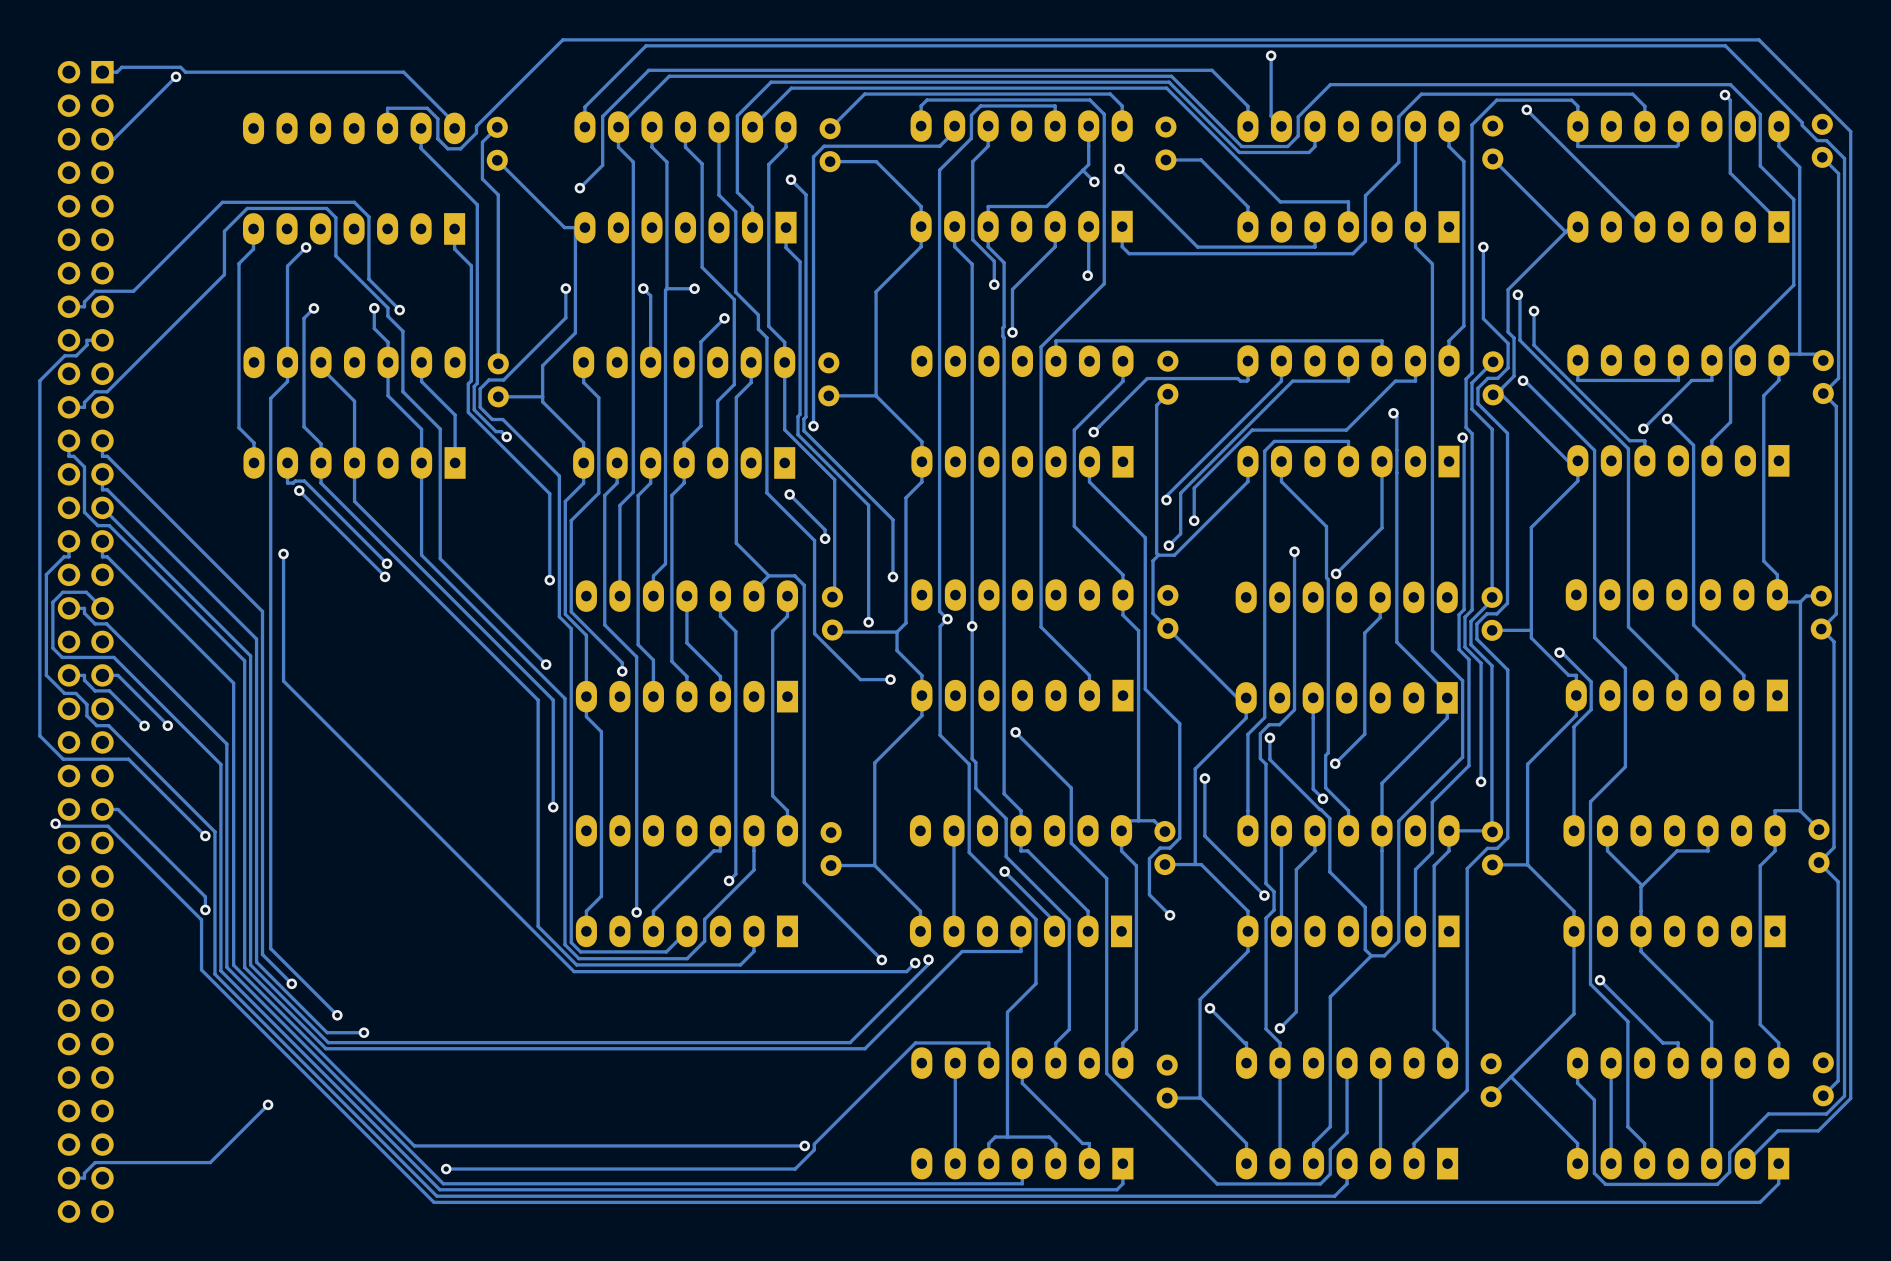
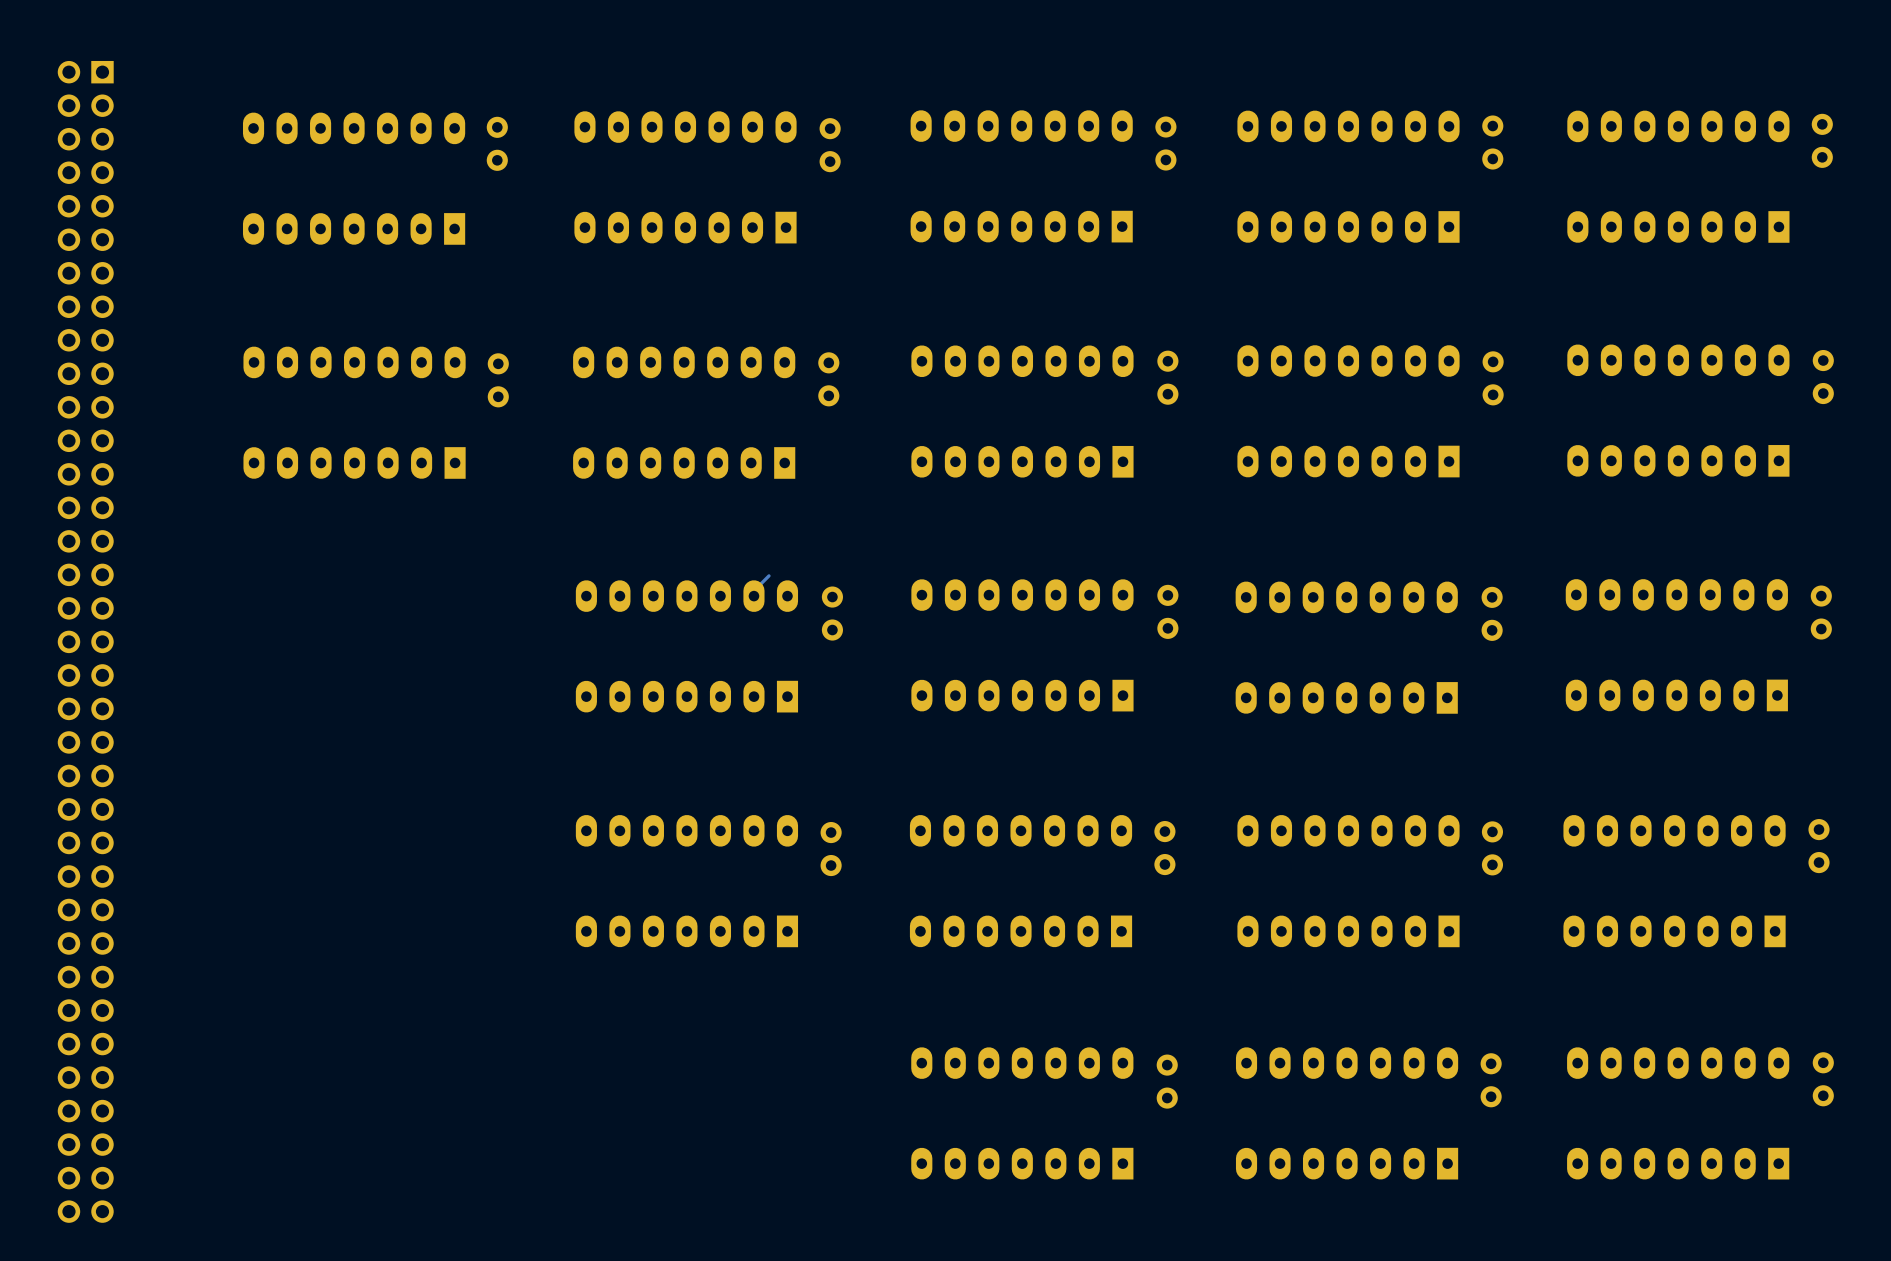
track: (1271, 55) (1271, 116) (1281, 126) -> none
via: (1271, 55) -> none
track: (102, 72) (117, 72) (121, 67) (180, 67) (185, 72) (403, 72) (454, 123) (454, 128) -> none
track: (176, 76) (113, 139) (102, 139) -> none
via: (176, 76) -> none
track: (1725, 95) (1730, 100) (1730, 173) (1778, 221) (1778, 226) -> none
via: (1725, 95) -> none
track: (1526, 109) (1644, 226) -> none
via: (1526, 109) -> none
track: (921, 126) (921, 105) (927, 100) (1089, 100) (1104, 114) (1104, 283) (1041, 346) (1041, 627) (1089, 675) (1089, 695) -> none
track: (954, 126) (954, 131) (939, 146) (824, 146) (813, 156) (813, 426) -> none
track: (988, 126) (988, 146) (972, 161) (972, 239) (994, 261) (994, 284) -> none
track: (1055, 126) (1055, 105) (980, 105) (971, 115) (971, 138) (939, 170) (939, 611) (947, 619) (940, 626) (940, 735) (969, 764) (969, 852) (1035, 919) (1035, 983) (1007, 1012) (1007, 1137) -> none
track: (1088, 126) (1088, 164) (1046, 206) (988, 206) (988, 246) (1004, 262) (1004, 793) (1021, 810) (1021, 850) (1027, 850) (1088, 911) (1088, 931) -> none
track: (1122, 126) (1122, 105) (1110, 94) (864, 94) (830, 128) -> none
track: (1247, 126) (1247, 106) (1211, 70) (648, 70) (602, 116) (602, 165) (579, 188) -> none
track: (1314, 126) (1314, 146) (1309, 152) (1239, 152) (1169, 82) (771, 82) (737, 115) (737, 192) (752, 207) (752, 227) -> none
track: (1415, 126) (1415, 247) (1432, 263) (1432, 650) (1462, 680) (1462, 757) (1398, 821) (1398, 941) (1384, 955) (1371, 955) -> none
track: (1449, 126) (1449, 146) (1463, 161) (1463, 326) (1449, 340) (1449, 361) -> none
track: (1644, 126) (1644, 106) (1632, 94) (1421, 94) (1398, 116) (1398, 162) (1365, 195) (1365, 241) (1352, 253) (1129, 253) (1122, 246) (1122, 226) -> none
track: (1678, 126) (1676, 146) (1577, 146) (1577, 106) (1571, 100) (1496, 100) (1472, 124) (1472, 373) (1466, 379) (1466, 427) (1472, 433) (1472, 610) (1465, 617) (1465, 647) (1481, 663) (1481, 781) -> none
track: (1778, 126) (1778, 146) (1799, 167) (1799, 354) -> none
track: (497, 127) (482, 142) (482, 179) (498, 194) (498, 363) -> none
track: (584, 127) (584, 106) (646, 45) (1725, 45) (1802, 122) (1802, 125) (1817, 140) (1826, 140) (1844, 158) (1844, 1095) (1826, 1113) (1768, 1113) (1729, 1152) (1729, 1172) (1717, 1184) (1605, 1184) (1594, 1173) (1594, 1099) (1577, 1083) (1577, 1063) -> none
track: (651, 127) (651, 147) (666, 162) (666, 288) -> none
track: (685, 127) (685, 147) (702, 163) (702, 267) (734, 299) (734, 384) (717, 401) (717, 462) -> none
track: (719, 127) (719, 195) (735, 211) (735, 292) (758, 314) (758, 329) (766, 337) (766, 492) (814, 540) (814, 633) (860, 679) (890, 679) -> none
track: (752, 127) (791, 88) (1166, 88) (1280, 201) (1348, 201) (1348, 226) -> none
track: (786, 127) (786, 147) (768, 164) (768, 326) (784, 342) (784, 429) (834, 479) (834, 594) (832, 597) -> none
track: (387, 128) (387, 108) (427, 108) (437, 118) (437, 138) (447, 148) (460, 148) (476, 132) (476, 126) (562, 39) (1759, 39) (1850, 131) (1850, 1098) (1818, 1130) (1777, 1130) (1745, 1163) -> none
track: (421, 128) (421, 148) (477, 204) (477, 383) (474, 386) (474, 409) (496, 431) (501, 431) (506, 436) -> none
track: (1822, 157) (1838, 173) (1838, 378) (1823, 393) (1836, 406) (1836, 614) (1821, 629) (1834, 641) (1834, 847) (1819, 862) (1838, 881) (1838, 1080) (1823, 1095) -> none
track: (1165, 159) (1201, 159) (1247, 206) (1247, 226) -> none
track: (1492, 159) (1565, 232) -> none
track: (497, 160) (564, 227) (584, 227) -> none
track: (830, 161) (876, 161) (921, 206) (921, 246) (876, 291) (876, 395) -> none
track: (1119, 168) (1197, 247) (1314, 247) (1314, 226) -> none
via: (1119, 168) -> none
track: (1082, 170) (1094, 181) -> none
track: (791, 179) (805, 194) (805, 416) (803, 419) (803, 430) (892, 519) (892, 577) -> none
via: (791, 179) -> none
via: (1094, 181) -> none
via: (579, 188) -> none
track: (954, 226) (954, 246) (972, 264) (972, 758) (975, 762) (975, 788) (1006, 818) (1006, 856) (1069, 919) (1069, 1029) (1055, 1042) (1055, 1063) -> none
track: (1055, 226) (1055, 246) (1012, 289) (1012, 332) -> none
track: (1088, 226) (1087, 275) -> none
track: (1577, 226) (1570, 226) (1508, 289) (1508, 332) (1514, 338) (1514, 376) (1501, 388) (1501, 394) -> none
track: (575, 227) (575, 332) (542, 365) (542, 401) (583, 442) (583, 483) (565, 501) (565, 614) (586, 635) (586, 716) (601, 731) (601, 896) (586, 911) (586, 931) -> none
track: (786, 227) (786, 247) (800, 261) (800, 414) (798, 416) (798, 434) (868, 505) (868, 622) -> none
track: (253, 228) (253, 249) (239, 263) (239, 427) (254, 442) (254, 462) -> none
track: (454, 228) (454, 249) (471, 265) (471, 380) (468, 383) (468, 412) (549, 493) (549, 580) -> none
track: (306, 247) (287, 266) (287, 381) (270, 398) (270, 948) (337, 1015) -> none
via: (306, 247) -> none
track: (1483, 247) (1483, 318) (1508, 343) (1508, 367) (1497, 378) (1487, 378) (1477, 388) (1477, 403) (1507, 433) (1507, 603) (1496, 613) (1486, 613) (1476, 623) (1476, 639) (1507, 670) (1507, 837) (1497, 848) (1487, 848) (1467, 868) (1467, 1090) (1414, 1143) (1414, 1163) -> none
via: (1483, 247) -> none
via: (1087, 275) -> none
via: (994, 284) -> none
track: (565, 288) (565, 317) (503, 380) (489, 380) (480, 388) (480, 407) (492, 419) (502, 419) (559, 476) (559, 616) (571, 628) (571, 942) (580, 951) (666, 951) (686, 931) -> none
via: (565, 288) -> none
track: (643, 288) (650, 295) (650, 362) -> none
via: (643, 288) -> none
track: (666, 288) (665, 563) (653, 575) (653, 596) -> none
track: (694, 288) (666, 288) -> none
via: (694, 288) -> none
track: (1517, 294) (1519, 296) (1519, 340) (1628, 448) (1628, 626) (1676, 675) (1676, 695) -> none
via: (1517, 294) -> none
track: (68, 306) (84, 306) (84, 301) (95, 291) (133, 291) (222, 202) (354, 202) (368, 216) (368, 279) (399, 310) -> none
track: (313, 308) (304, 318) (304, 426) (321, 443) (321, 483) (538, 700) (538, 926) (576, 964) (740, 964) (753, 951) (753, 931) -> none
via: (313, 308) -> none
track: (374, 308) (374, 328) (388, 342) (388, 395) (421, 429) (421, 555) (564, 698) (564, 944) (578, 958) (687, 958) (704, 941) (704, 919) (753, 870) (753, 830) -> none
via: (374, 308) -> none
via: (399, 310) -> none
track: (1534, 311) (1534, 345) (1629, 440) (1644, 440) (1644, 460) -> none
via: (1534, 311) -> none
track: (724, 318) (700, 341) (700, 426) (684, 442) (684, 483) (671, 495) (671, 661) (686, 676) (686, 696) -> none
via: (724, 318) -> none
via: (1012, 332) -> none
track: (102, 340) (86, 340) (86, 345) (76, 355) (64, 355) (39, 380) (39, 735) (63, 759) (128, 759) (205, 835) -> none
track: (1678, 360) (1678, 380) (1577, 380) (1577, 360) -> none
track: (1711, 360) (1711, 380) (1691, 380) (1643, 428) -> none
track: (1823, 360) (1816, 354) (1785, 354) (1778, 360) (1778, 380) (1763, 395) (1763, 561) (1777, 574) (1777, 594) (1784, 601) (1800, 601) -> none
track: (1122, 361) (1122, 381) (1074, 430) (1074, 526) (1122, 574) (1122, 615) (1138, 630) (1138, 820) -> none
track: (1247, 361) (1246, 381) (1240, 381) (1237, 378) (1147, 378) (1093, 432) -> none
track: (1281, 361) (1281, 381) (1166, 496) (1166, 500) -> none
track: (1348, 361) (1348, 381) (1292, 381) (1180, 493) (1180, 533) (1168, 545) -> none
track: (1382, 361) (1382, 340) (1056, 340) (1055, 361) -> none
track: (1415, 361) (1415, 381) (1395, 381) (1346, 430) (1252, 430) (1194, 488) (1194, 520) -> none
track: (1493, 361) (1472, 382) (1472, 409) (1492, 429) (1492, 600) (1470, 621) (1470, 644) (1491, 665) (1492, 831) -> none
track: (321, 362) (321, 367) (354, 401) (354, 501) (553, 700) (553, 807) -> none
track: (421, 362) (421, 381) (455, 415) (455, 462) -> none
track: (583, 362) (583, 382) (598, 397) (598, 493) (571, 520) (571, 611) (622, 662) (622, 671) -> none
track: (751, 362) (751, 382) (736, 397) (736, 543) (768, 575) (794, 575) (804, 585) (804, 882) (881, 960) -> none
track: (1523, 380) (1594, 450) (1594, 637) (1625, 668) (1625, 766) (1590, 801) (1590, 984) (1627, 1021) -> none
via: (1523, 380) -> none
track: (1167, 394) (1156, 405) (1156, 553) (1158, 555) -> none
track: (1501, 394) (1577, 470) -> none
track: (876, 395) (828, 395) -> none
track: (876, 395) (921, 441) (921, 481) (905, 497) (905, 623) (897, 632) -> none
track: (542, 396) (498, 396) -> none
track: (68, 407) (84, 407) (84, 402) (95, 391) (107, 391) (224, 274) (224, 231) (247, 208) (326, 208) (335, 217) (335, 255) (387, 307) (387, 316) (402, 331) (402, 391) (440, 429) (440, 558) (546, 664) -> none
track: (1393, 413) (1396, 416) (1396, 642) (1447, 692) (1447, 718) (1382, 783) (1382, 931) -> none
via: (1393, 413) -> none
track: (1667, 418) (1693, 445) (1693, 625) (1743, 675) (1743, 695) -> none
via: (1667, 418) -> none
via: (813, 426) -> none
via: (1643, 428) -> none
via: (1093, 432) -> none
via: (506, 436) -> none
track: (1462, 437) (1464, 609) (1459, 614) (1459, 649) (1468, 659) (1468, 765) (1432, 802) (1432, 852) (1415, 869) (1415, 931) -> none
via: (1462, 437) -> none
track: (68, 440) (68, 456) (73, 456) (84, 466) (84, 512) (97, 525) (109, 525) (244, 660) (244, 967) (325, 1048) (864, 1048) (962, 951) (1021, 951) (1021, 931) -> none
track: (102, 440) (102, 456) (107, 456) (262, 611) (262, 954) (291, 983) -> none
track: (1577, 460) (1577, 480) (1531, 527) (1531, 637) (1568, 675) (1576, 675) (1576, 715) (1527, 764) (1527, 864) -> none
track: (1711, 460) (1711, 440) (1730, 422) (1730, 348) (1793, 285) (1793, 199) (1760, 165) (1760, 114) (1730, 84) (1330, 84) (1298, 116) (1298, 136) (1287, 146) (1241, 146) (1171, 76) (669, 76) (618, 127) (618, 147) (633, 162) (633, 492) (619, 505) (619, 596) -> none
track: (1089, 461) (1089, 481) (1145, 537) (1145, 689) (1179, 723) (1179, 838) (1169, 848) (1160, 848) (1149, 858) (1149, 894) (1170, 915) -> none
track: (1247, 461) (1247, 481) (1174, 555) (1158, 555) -> none
track: (1281, 461) (1281, 481) (1326, 526) (1328, 752) (1325, 755) (1325, 787) (1348, 810) (1348, 830) -> none
track: (1348, 461) (1348, 441) (1274, 441) (1264, 451) (1264, 717) (1247, 734) (1247, 830) -> none
track: (1382, 461) (1382, 527) (1336, 573) -> none
track: (287, 462) (287, 483) (304, 481) (387, 563) -> none
track: (617, 462) (617, 483) (604, 495) (604, 625) (636, 656) (636, 912) -> none
track: (650, 462) (650, 483) (638, 495) (638, 644) (653, 660) (653, 696) -> none
track: (102, 474) (102, 489) (107, 489) (256, 639) (256, 962) (327, 1032) (363, 1032) -> none
track: (299, 490) (385, 576) -> none
via: (299, 490) -> none
track: (789, 494) (825, 529) (825, 538) -> none
via: (789, 494) -> none
via: (1166, 500) -> none
track: (102, 507) (250, 655) (250, 964) (328, 1042) (850, 1042) (928, 964) (928, 959) -> none
via: (1194, 520) -> none
via: (825, 538) -> none
track: (68, 541) (68, 556) (64, 556) (46, 574) (46, 675) (64, 693) (75, 693) (86, 704) (86, 715) (96, 725) (108, 725) (214, 831) (214, 974) (436, 1196) (1334, 1196) (1347, 1183) (1347, 1163) -> none
track: (102, 541) (102, 556) (107, 556) (233, 683) (233, 965) (414, 1145) (804, 1145) -> none
via: (1168, 545) -> none
track: (1294, 551) (1294, 709) (1279, 724) (1269, 724) (1260, 733) (1260, 758) (1265, 764) (1265, 883) (1274, 891) (1274, 910) (1266, 918) (1266, 1029) (1280, 1042) (1280, 1163) -> none
via: (1294, 551) -> none
track: (283, 554) (283, 681) (574, 971) (906, 971) (915, 963) -> none
via: (283, 554) -> none
track: (1158, 555) (1153, 560) (1153, 613) (1237, 697) (1246, 697) (1246, 718) (1195, 768) (1195, 864) -> none
via: (387, 563) -> none
via: (1336, 573) -> none
via: (385, 576) -> none
via: (892, 577) -> none
via: (549, 580) -> none
track: (686, 596) (686, 643) (720, 676) (720, 696) -> none
track: (720, 596) (720, 616) (735, 631) (735, 874) (729, 880) -> none
track: (787, 596) (787, 616) (772, 631) (772, 795) (787, 810) (787, 830) -> none
track: (1821, 596) (1806, 596) (1800, 601) -> none
track: (1380, 597) (1380, 617) (1364, 632) (1364, 734) (1335, 763) -> none
track: (1800, 601) (1800, 811) (1819, 829) -> none
track: (68, 608) (84, 608) (84, 613) (95, 623) (106, 623) (226, 744) (226, 967) (443, 1183) (1022, 1183) (1022, 1163) -> none
track: (102, 608) (86, 592) (62, 592) (52, 602) (52, 648) (62, 657) (113, 657) (220, 764) (220, 970) (439, 1189) (1116, 1189) (1122, 1183) (1122, 1163) -> none
via: (947, 619) -> none
via: (868, 622) -> none
via: (972, 626) -> none
track: (832, 630) (834, 632) (897, 632) -> none
track: (1531, 630) (1492, 630) -> none
track: (897, 632) (897, 650) (921, 675) (921, 715) (874, 762) (874, 865) -> none
track: (1559, 652) (1562, 652) (1591, 681) (1591, 709) (1574, 726) (1574, 830) -> none
via: (1559, 652) -> none
via: (546, 664) -> none
via: (622, 671) -> none
track: (68, 675) (84, 675) (84, 680) (95, 690) (109, 690) (144, 725) -> none
track: (102, 675) (117, 675) (167, 725) -> none
via: (890, 679) -> none
track: (1313, 697) (1313, 789) (1322, 798) -> none
via: (144, 725) -> none
via: (167, 725) -> none
track: (1015, 732) (1071, 788) (1071, 843) (1106, 878) (1106, 1073) (1217, 1183) (1320, 1183) (1330, 1174) (1330, 1149) (1347, 1132) (1347, 1063) -> none
via: (1015, 732) -> none
track: (1269, 737) (1269, 759) (1329, 818) (1329, 871) (1365, 907) (1365, 949) (1371, 955) -> none
via: (1269, 737) -> none
via: (1335, 763) -> none
track: (1204, 778) (1204, 836) (1264, 895) -> none
via: (1204, 778) -> none
via: (1481, 781) -> none
via: (1322, 798) -> none
via: (553, 807) -> none
track: (102, 809) (117, 809) (205, 896) (205, 909) -> none
track: (1800, 810) (1775, 810) (1775, 850) (1760, 865) (1760, 1024) (1778, 1042) (1778, 1063) -> none
track: (55, 823) (58, 826) (107, 826) (201, 919) (201, 969) (433, 1202) (1760, 1202) (1778, 1183) (1778, 1163) -> none
via: (55, 823) -> none
track: (720, 830) (720, 850) (713, 850) (653, 911) (653, 931) -> none
track: (953, 830) (953, 931) -> none
track: (1281, 830) (1281, 931) -> none
track: (1314, 830) (1314, 850) (1296, 869) (1296, 1011) (1279, 1028) -> none
track: (1491, 830) (1449, 830) (1449, 850) (1434, 865) (1434, 1029) (1447, 1042) (1447, 1063) -> none
track: (1607, 830) (1607, 850) (1642, 885) -> none
track: (1708, 830) (1708, 850) (1677, 850) (1641, 886) (1641, 951) (1711, 1022) (1711, 1163) -> none
track: (1164, 831) (1154, 820) (1121, 820) (1121, 850) (1136, 865) (1136, 1029) (1122, 1042) (1122, 1063) -> none
via: (205, 835) -> none
track: (1164, 864) (1201, 864) (1247, 911) (1247, 951) (1200, 999) (1200, 1098) -> none
track: (1527, 864) (1492, 864) -> none
track: (1527, 864) (1574, 911) (1574, 1013) (1511, 1076) -> none
track: (874, 865) (831, 865) -> none
track: (874, 865) (920, 911) (920, 931) -> none
track: (1004, 871) (1054, 921) (1054, 931) -> none
via: (1004, 871) -> none
via: (729, 880) -> none
via: (1264, 895) -> none
via: (205, 909) -> none
via: (636, 912) -> none
via: (1170, 915) -> none
track: (1371, 955) (1330, 996) (1330, 1126) (1313, 1143) (1313, 1163) -> none
via: (928, 959) -> none
via: (881, 960) -> none
via: (915, 963) -> none
track: (1600, 980) (1662, 1042) (1678, 1042) (1678, 1063) -> none
via: (1600, 980) -> none
via: (291, 983) -> none
track: (1209, 1008) (1246, 1042) (1246, 1063) -> none
via: (1209, 1008) -> none
via: (337, 1015) -> none
track: (1627, 1021) (1627, 1126) (1644, 1143) (1644, 1163) -> none
via: (1279, 1028) -> none
via: (363, 1032) -> none
track: (955, 1063) (955, 1163) -> none
track: (988, 1063) (988, 1042) (915, 1042) (814, 1144) (814, 1149) (795, 1169) (446, 1169) -> none
track: (1022, 1063) (1022, 1083) (1082, 1143) (1089, 1143) (1089, 1163) -> none
track: (1380, 1063) (1380, 1163) -> none
track: (1611, 1063) (1611, 1163) -> none
track: (1511, 1076) (1577, 1143) (1577, 1163) -> none
track: (1511, 1076) (1491, 1096) -> none
track: (1167, 1098) (1201, 1098) (1246, 1143) (1246, 1163) -> none
track: (268, 1104) (210, 1162) (95, 1162) (84, 1173) (84, 1178) (68, 1178) -> none
via: (268, 1104) -> none
via: (804, 1145) -> none
track: (1055, 1163) (1055, 1143) (1049, 1137) (995, 1137) (988, 1143) (988, 1163) -> none
via: (446, 1169) -> none

